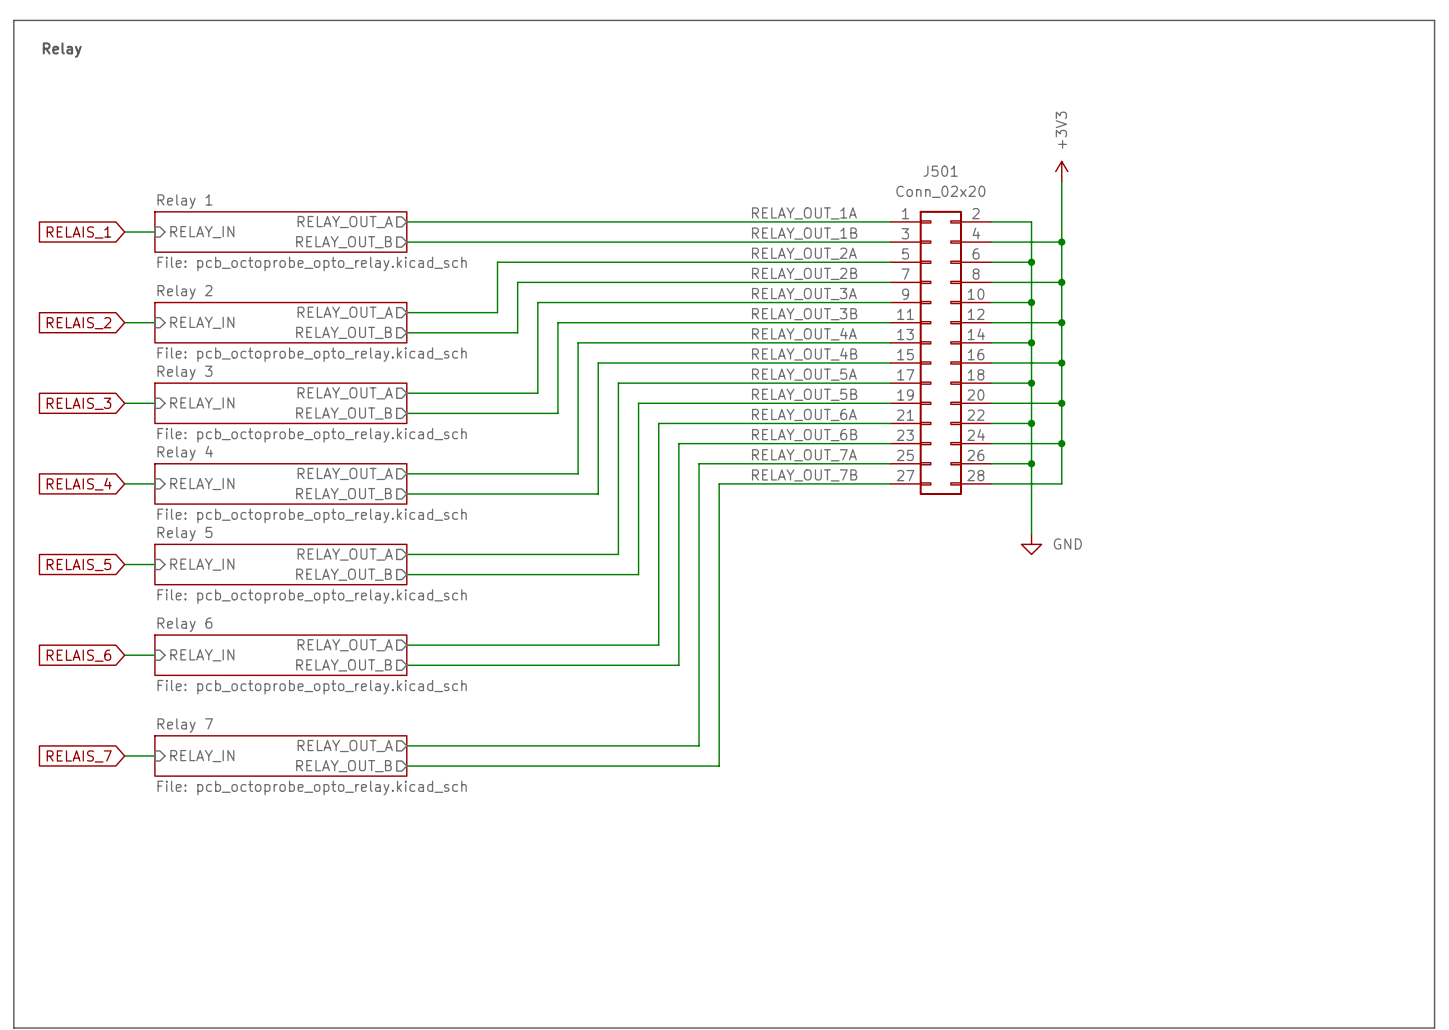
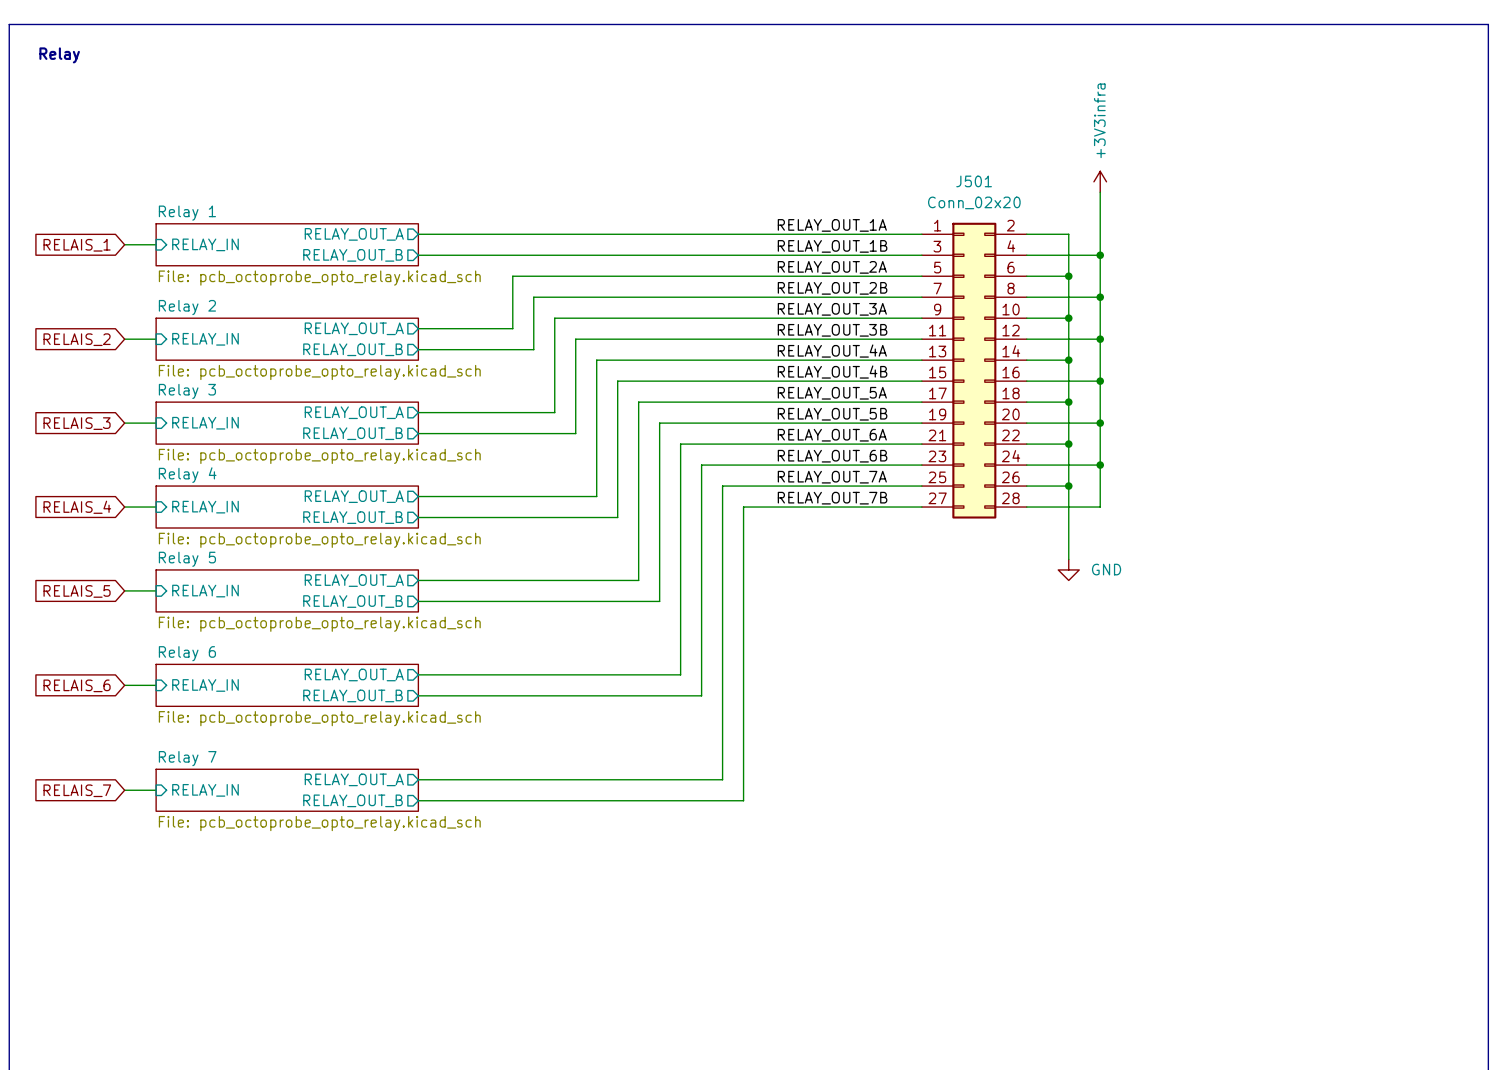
power symbol: +3V3 (1061, 171) -> +3V3infra (1100, 181)

